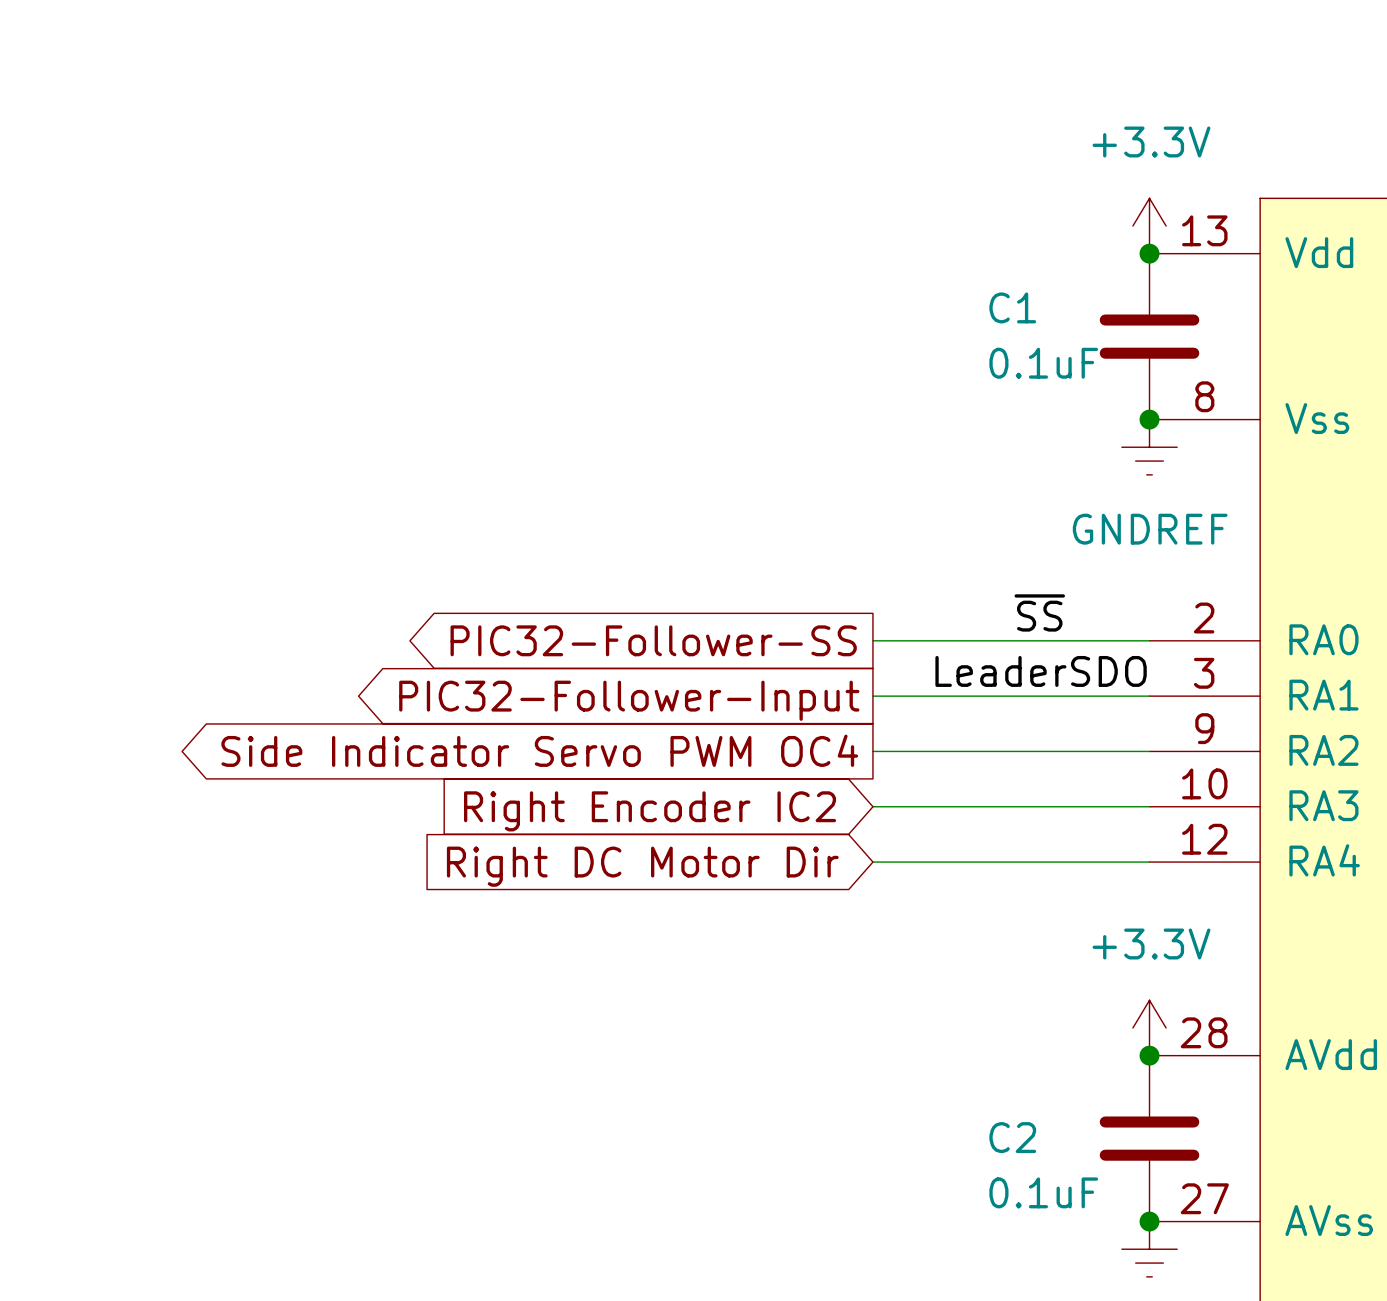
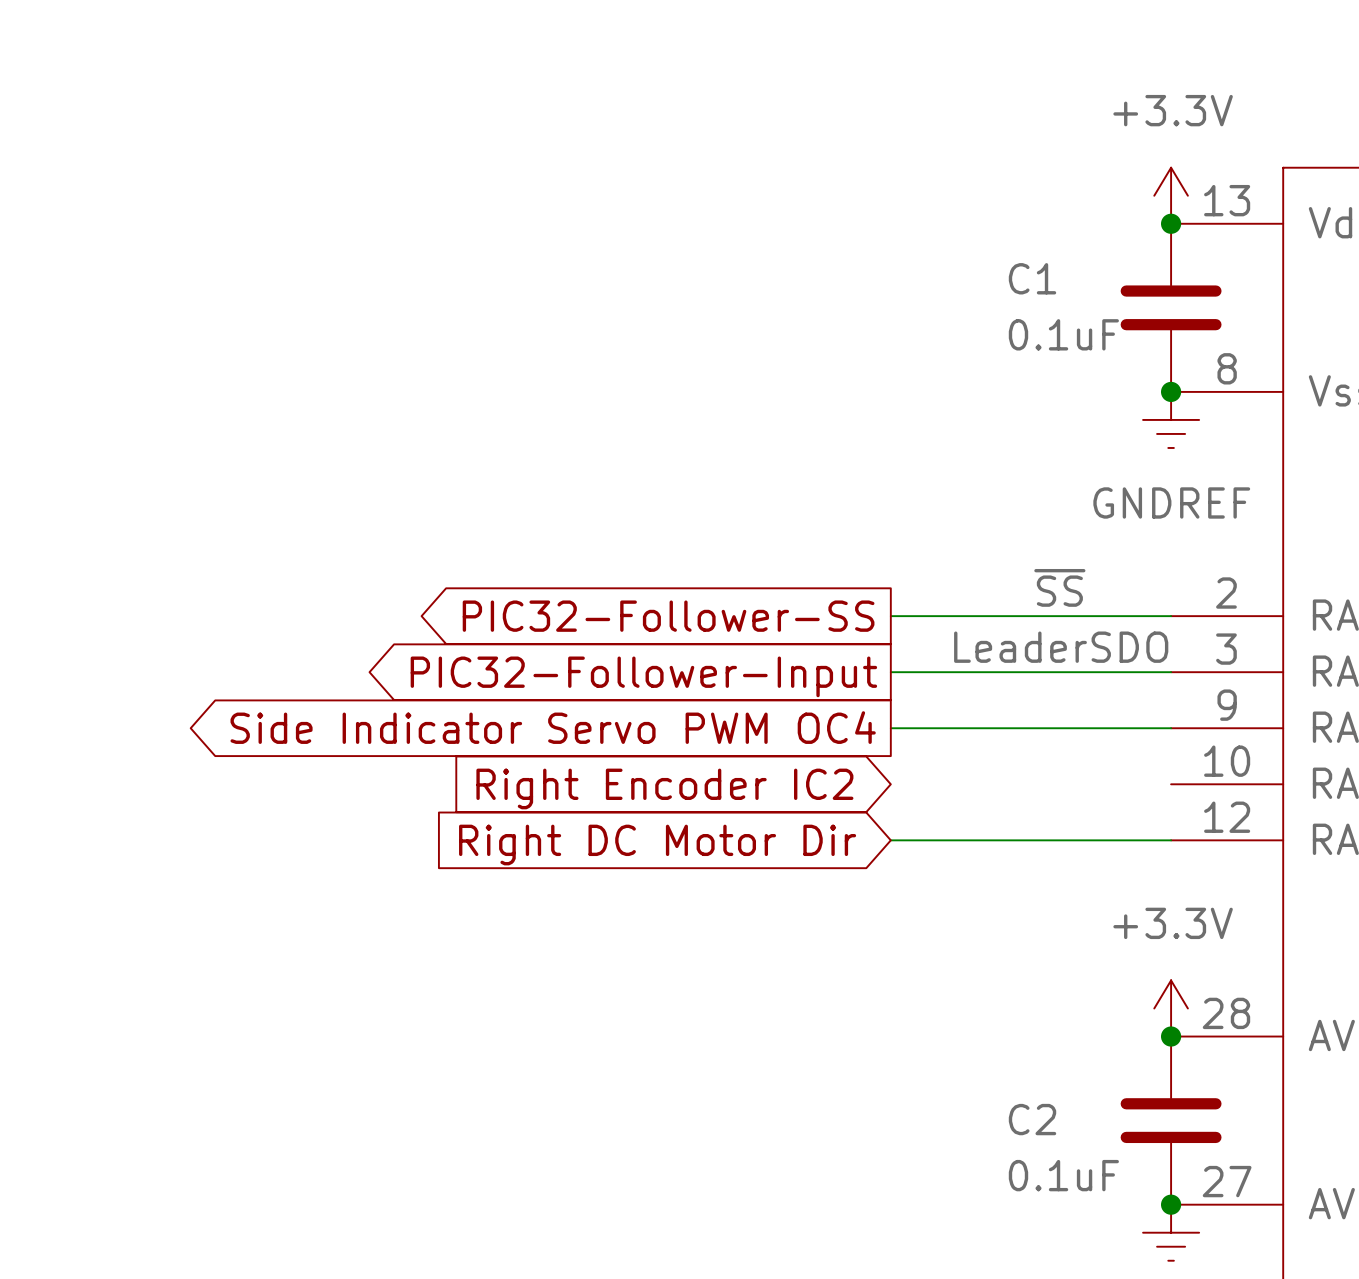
wire: (872, 806) (1149, 806) -> none

